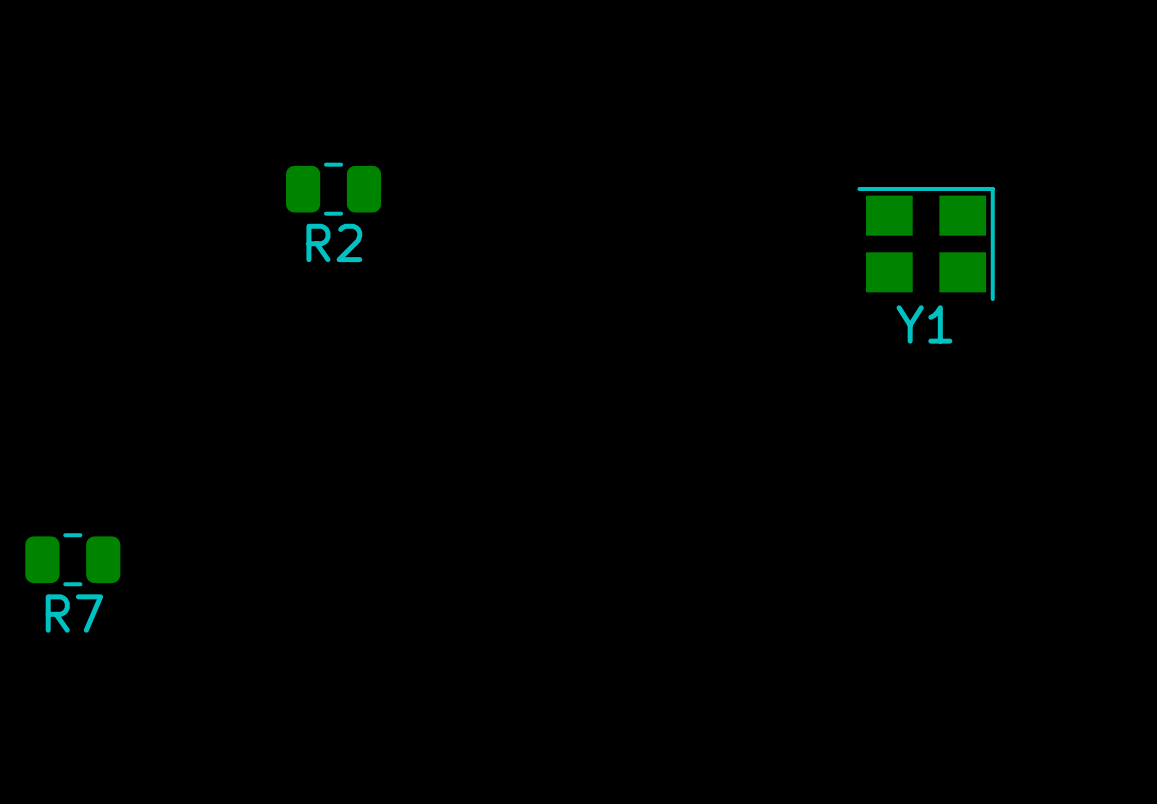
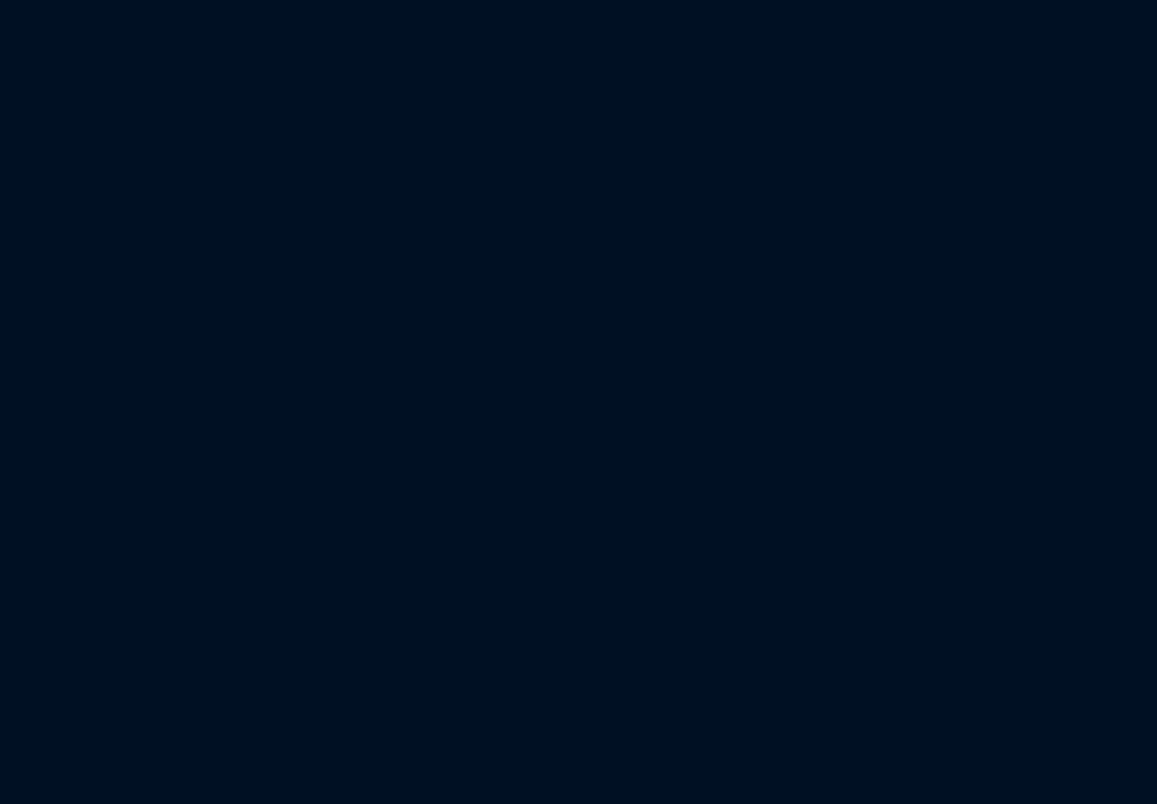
R2: (333, 189) -> none
Y1: (926, 243) -> none
R7: (72, 559) -> none

